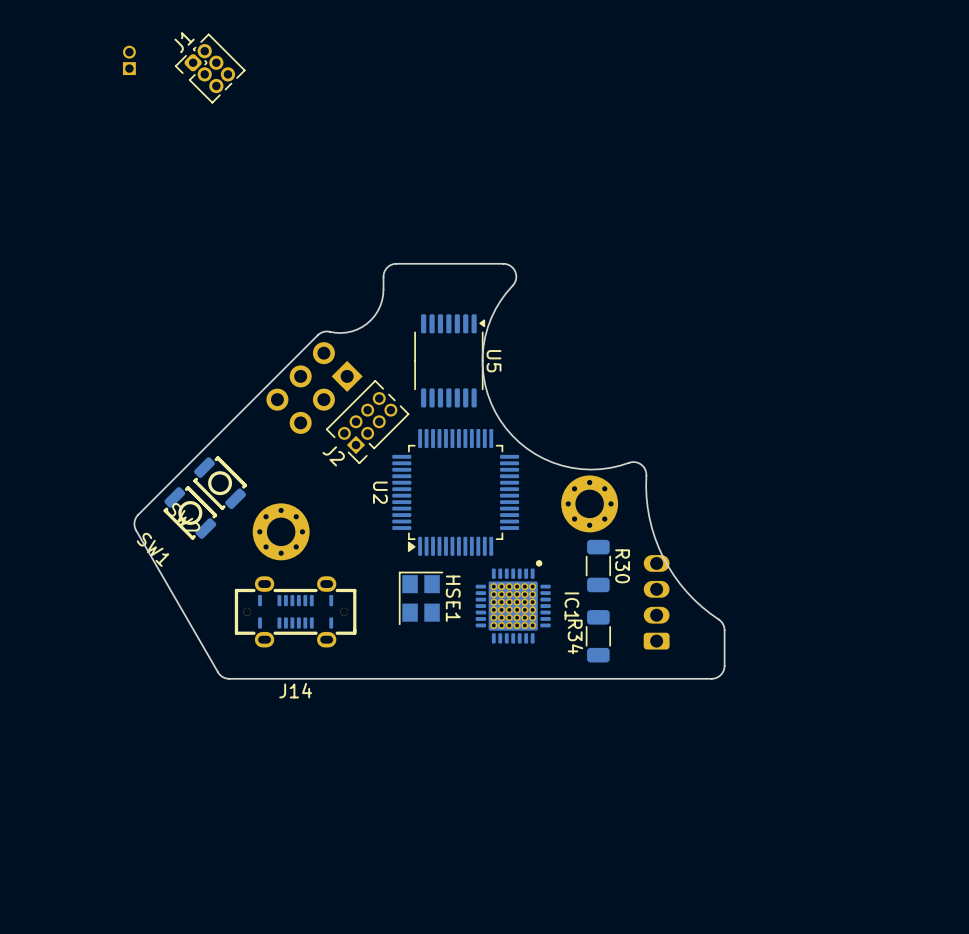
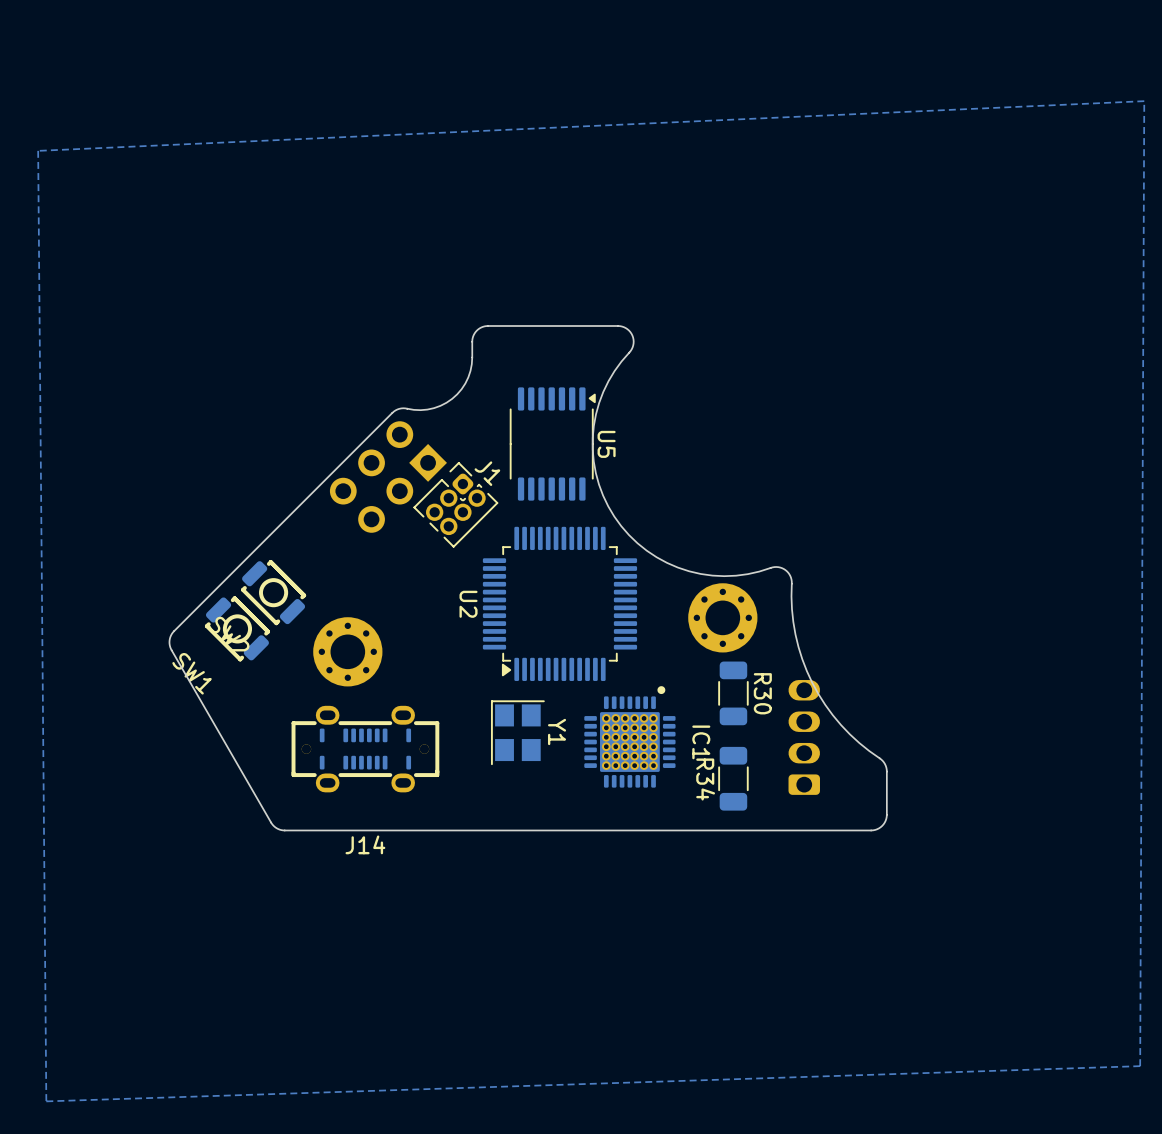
part: (129, 60) -> none
J1 rotation: 0° (210, 68) -> 90° clockwise (455, 504)
J1 position: (210, 68) -> (455, 504)
zone outline: none -> (1144, 101) (38, 150) (46, 1101) (1140, 1066) (1144, 101)
J2: (367, 422) -> none
HSE1 name: HSE1 (453, 598) -> Y1 (557, 731)

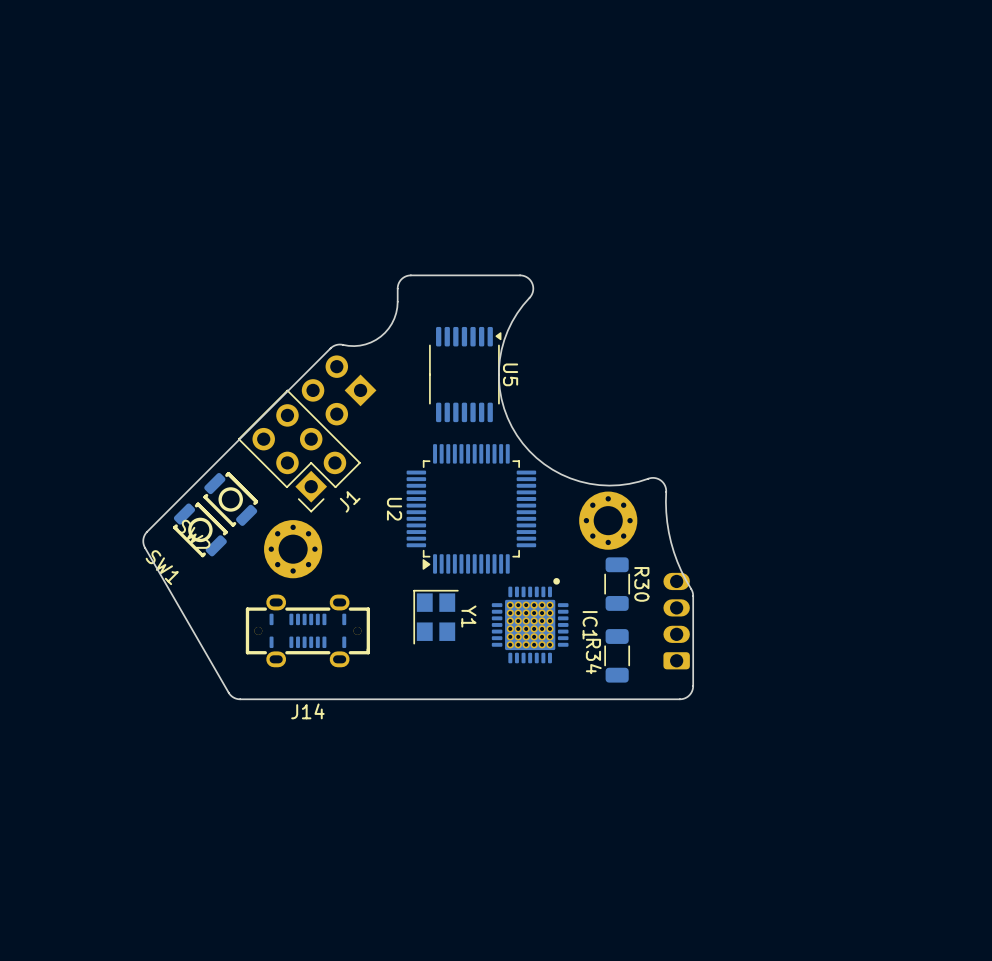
zone outline: (1144, 101) (38, 150) (46, 1101) (1140, 1066) (1144, 101) -> none
J1 footprint: [413, 462, 499, 548] -> [238, 389, 361, 513]
J1 name position: J1 (487, 473) -> J1 (350, 501)
part: (388, 477) -> none
board edge: (791, 583) (791, 609) (795, 634) (802, 659) (812, 682) (825, 704) (841, 725) (859, 742) (882, 760) (886, 769) (886, 816) (880, 827) (871, 830) (808, 830) -> (666, 491) (667, 522) (671, 542) (677, 561) (693, 594) (693, 687) (688, 696) (679, 699)

